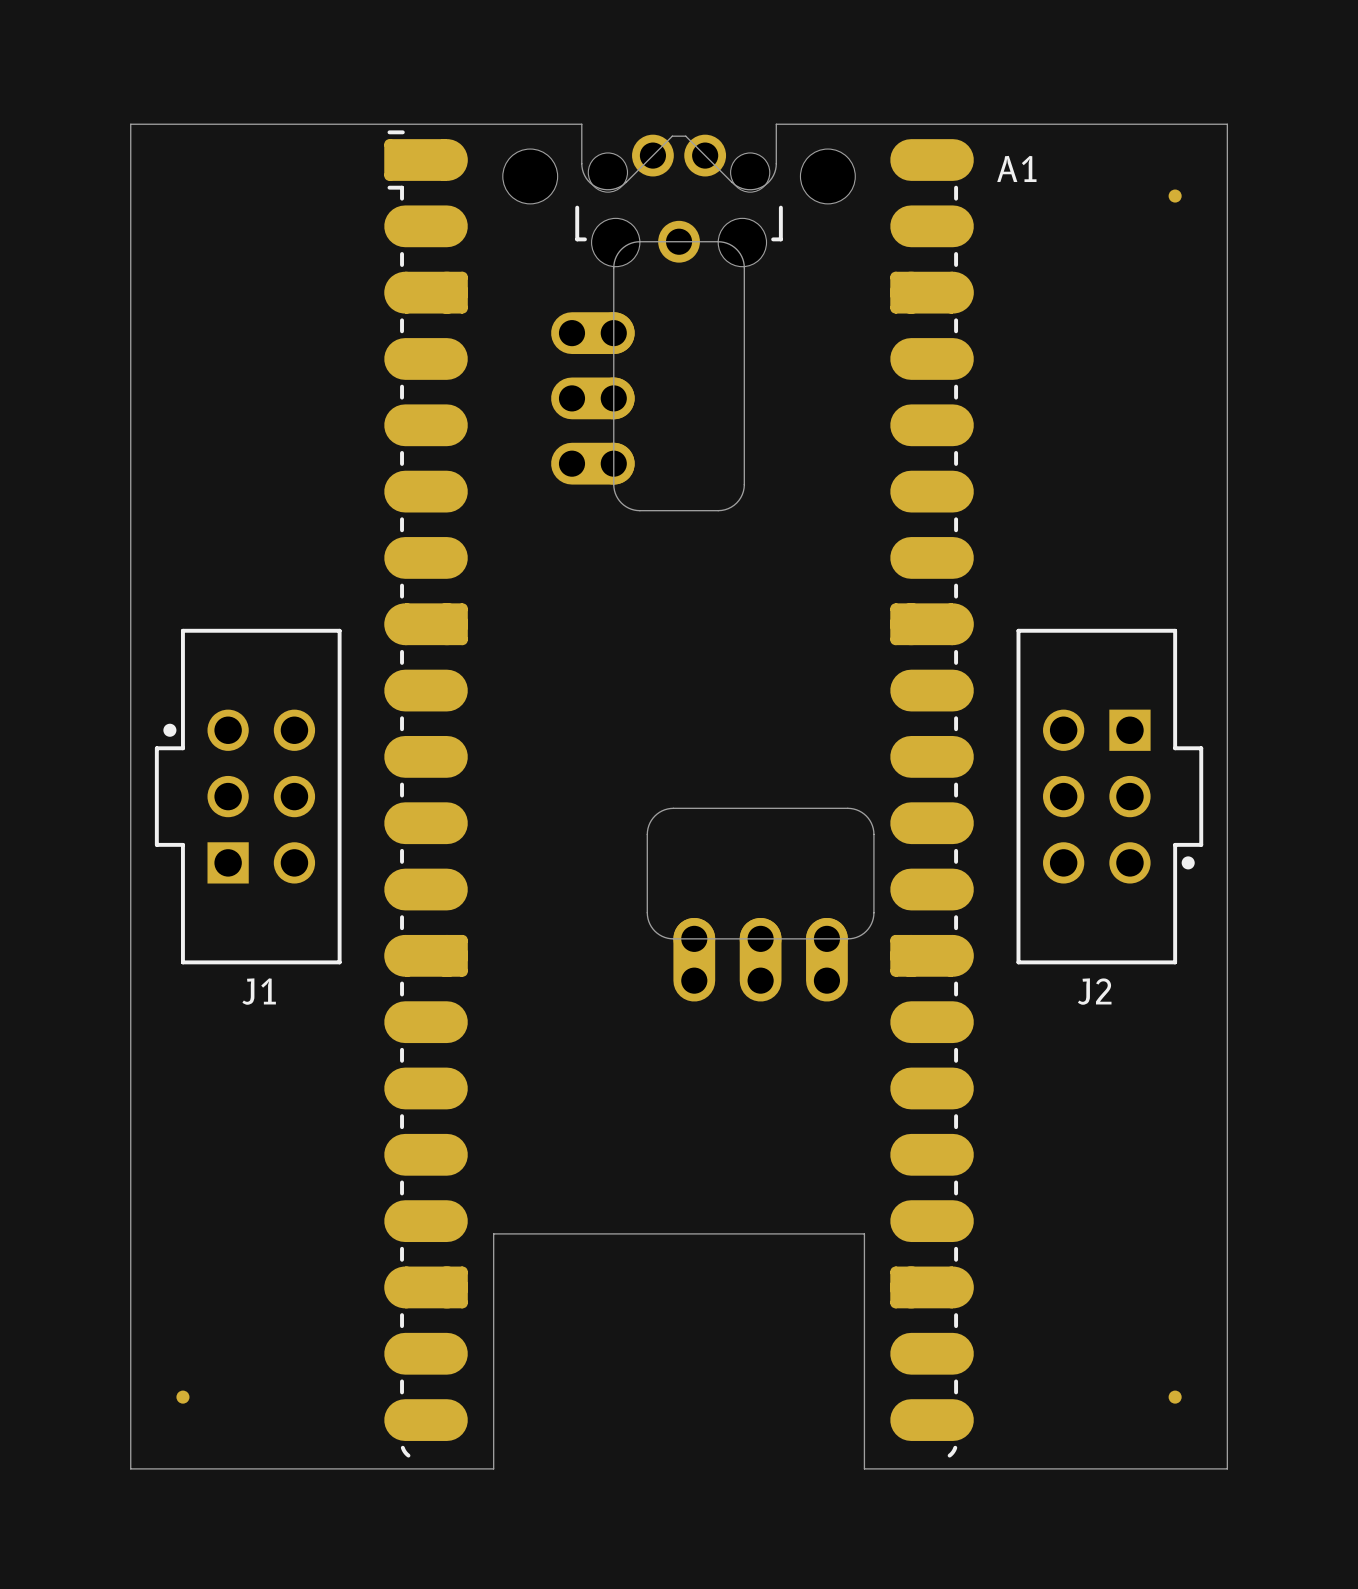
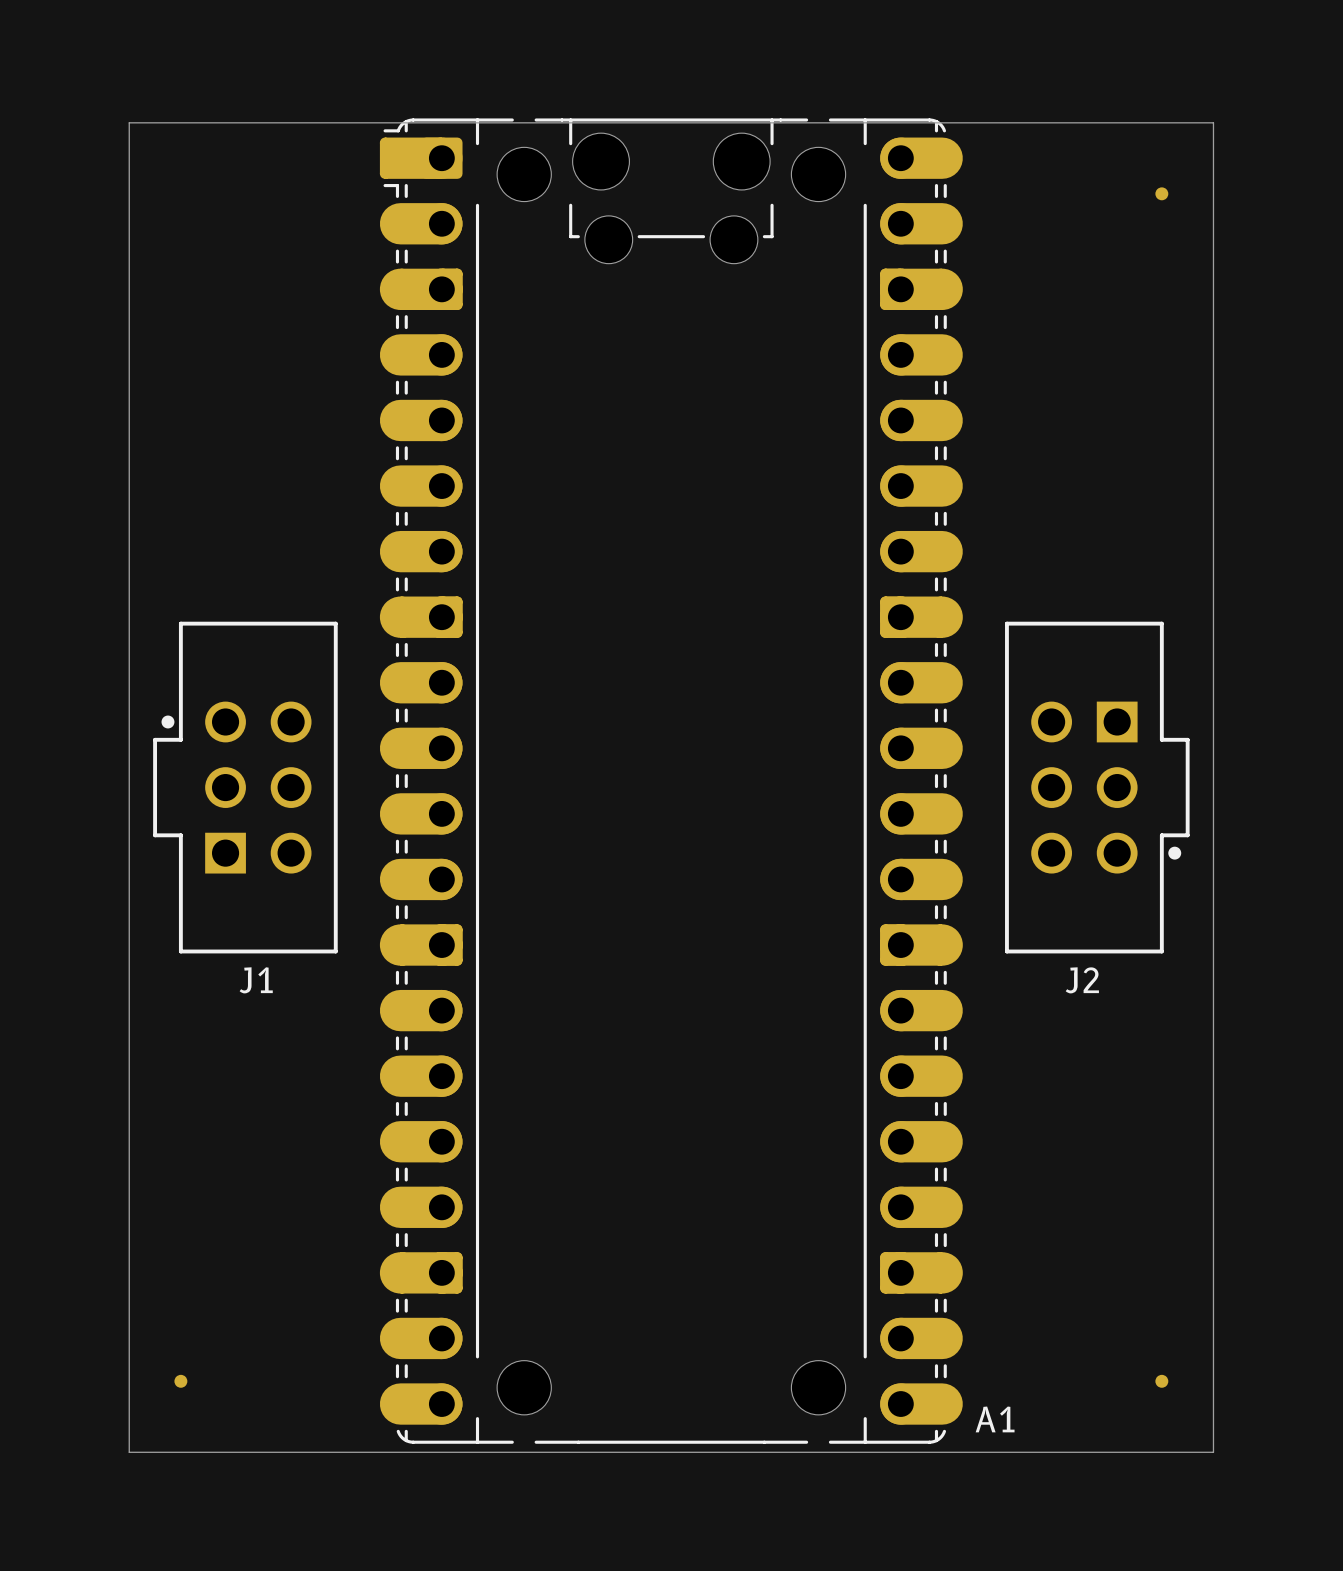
A1 footprint: [130, 123, 1229, 1470] -> [379, 118, 963, 1444]
board edge: none -> (129, 122) (1213, 122)
A1 name position: A1 (1016, 168) -> A1 (995, 1419)
board edge: none -> (129, 1452) (1213, 1452)

